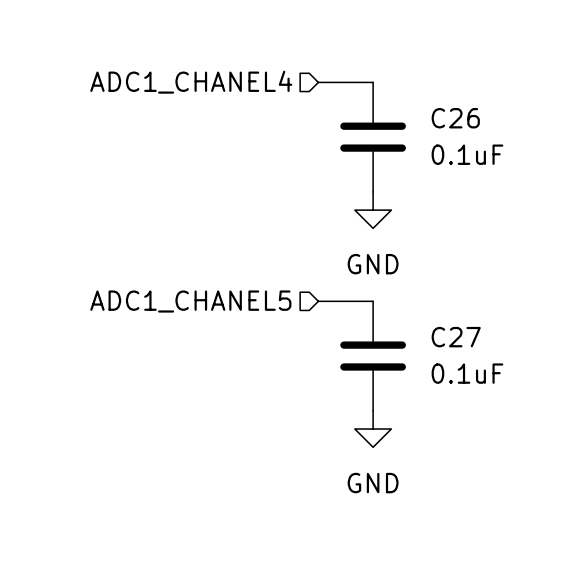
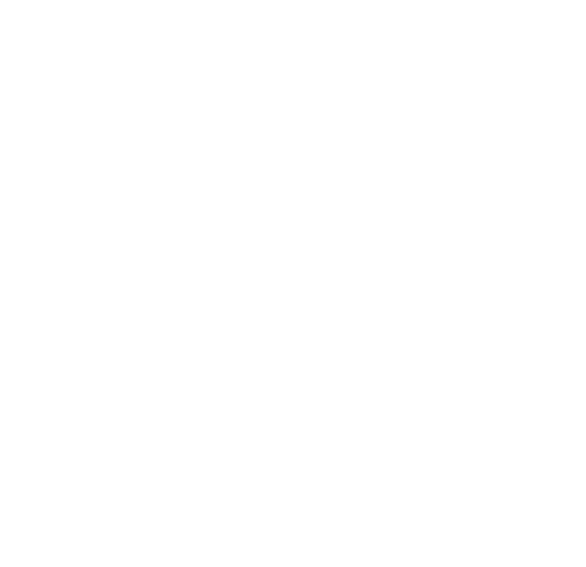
hierarchical label: ADC1_CHANEL4 (191, 82) -> none
wire: (318, 82) (373, 82) -> none
C26: 0.1uF (373, 137) -> none
power symbol: GND (373, 210) -> none
hierarchical label: ADC1_CHANEL5 (190, 301) -> none
wire: (318, 301) (373, 301) -> none
C27: 0.1uF (373, 356) -> none
power symbol: GND (373, 429) -> none

